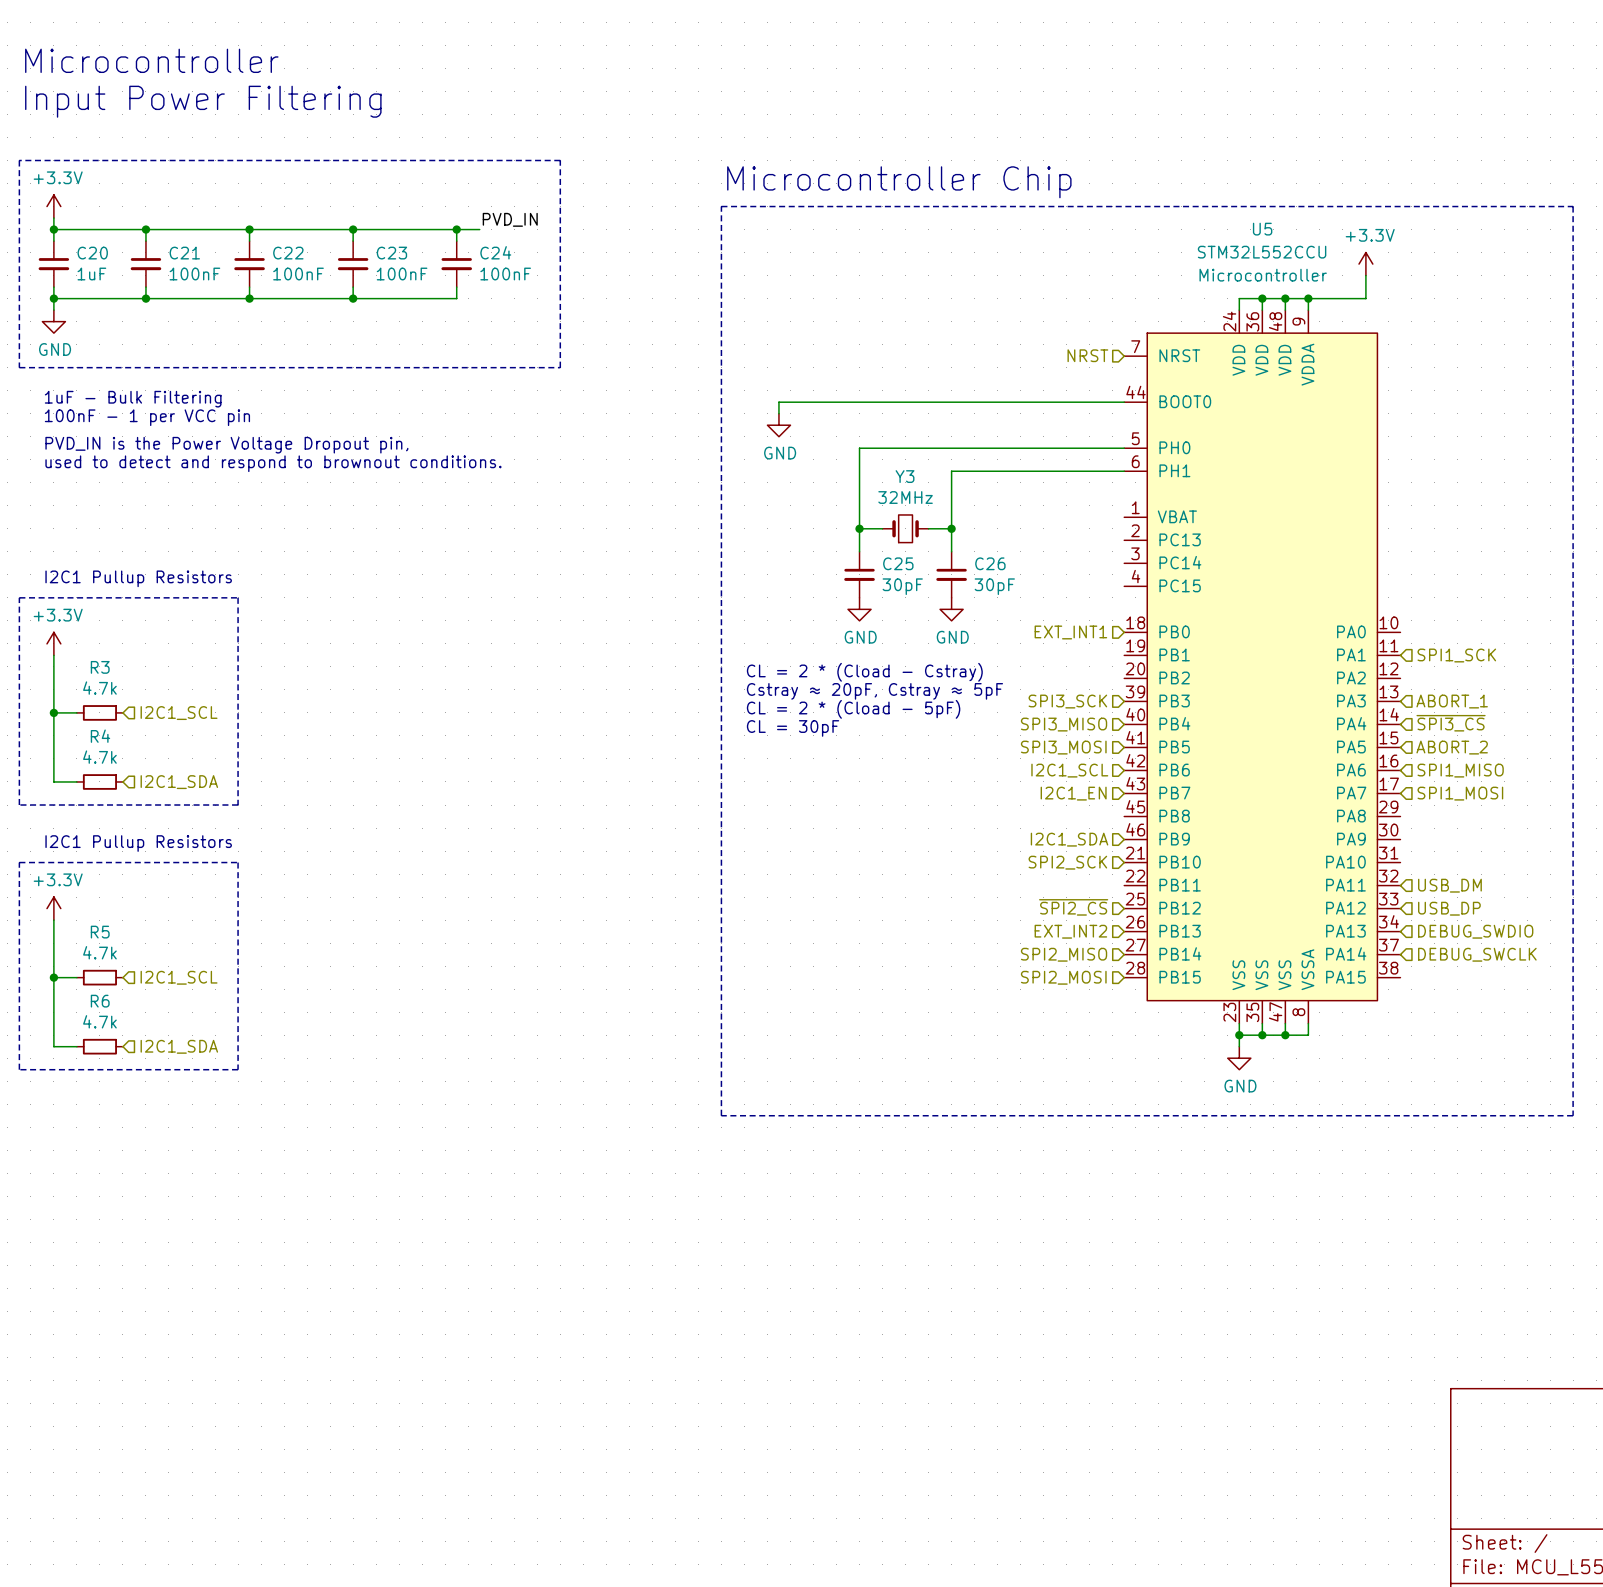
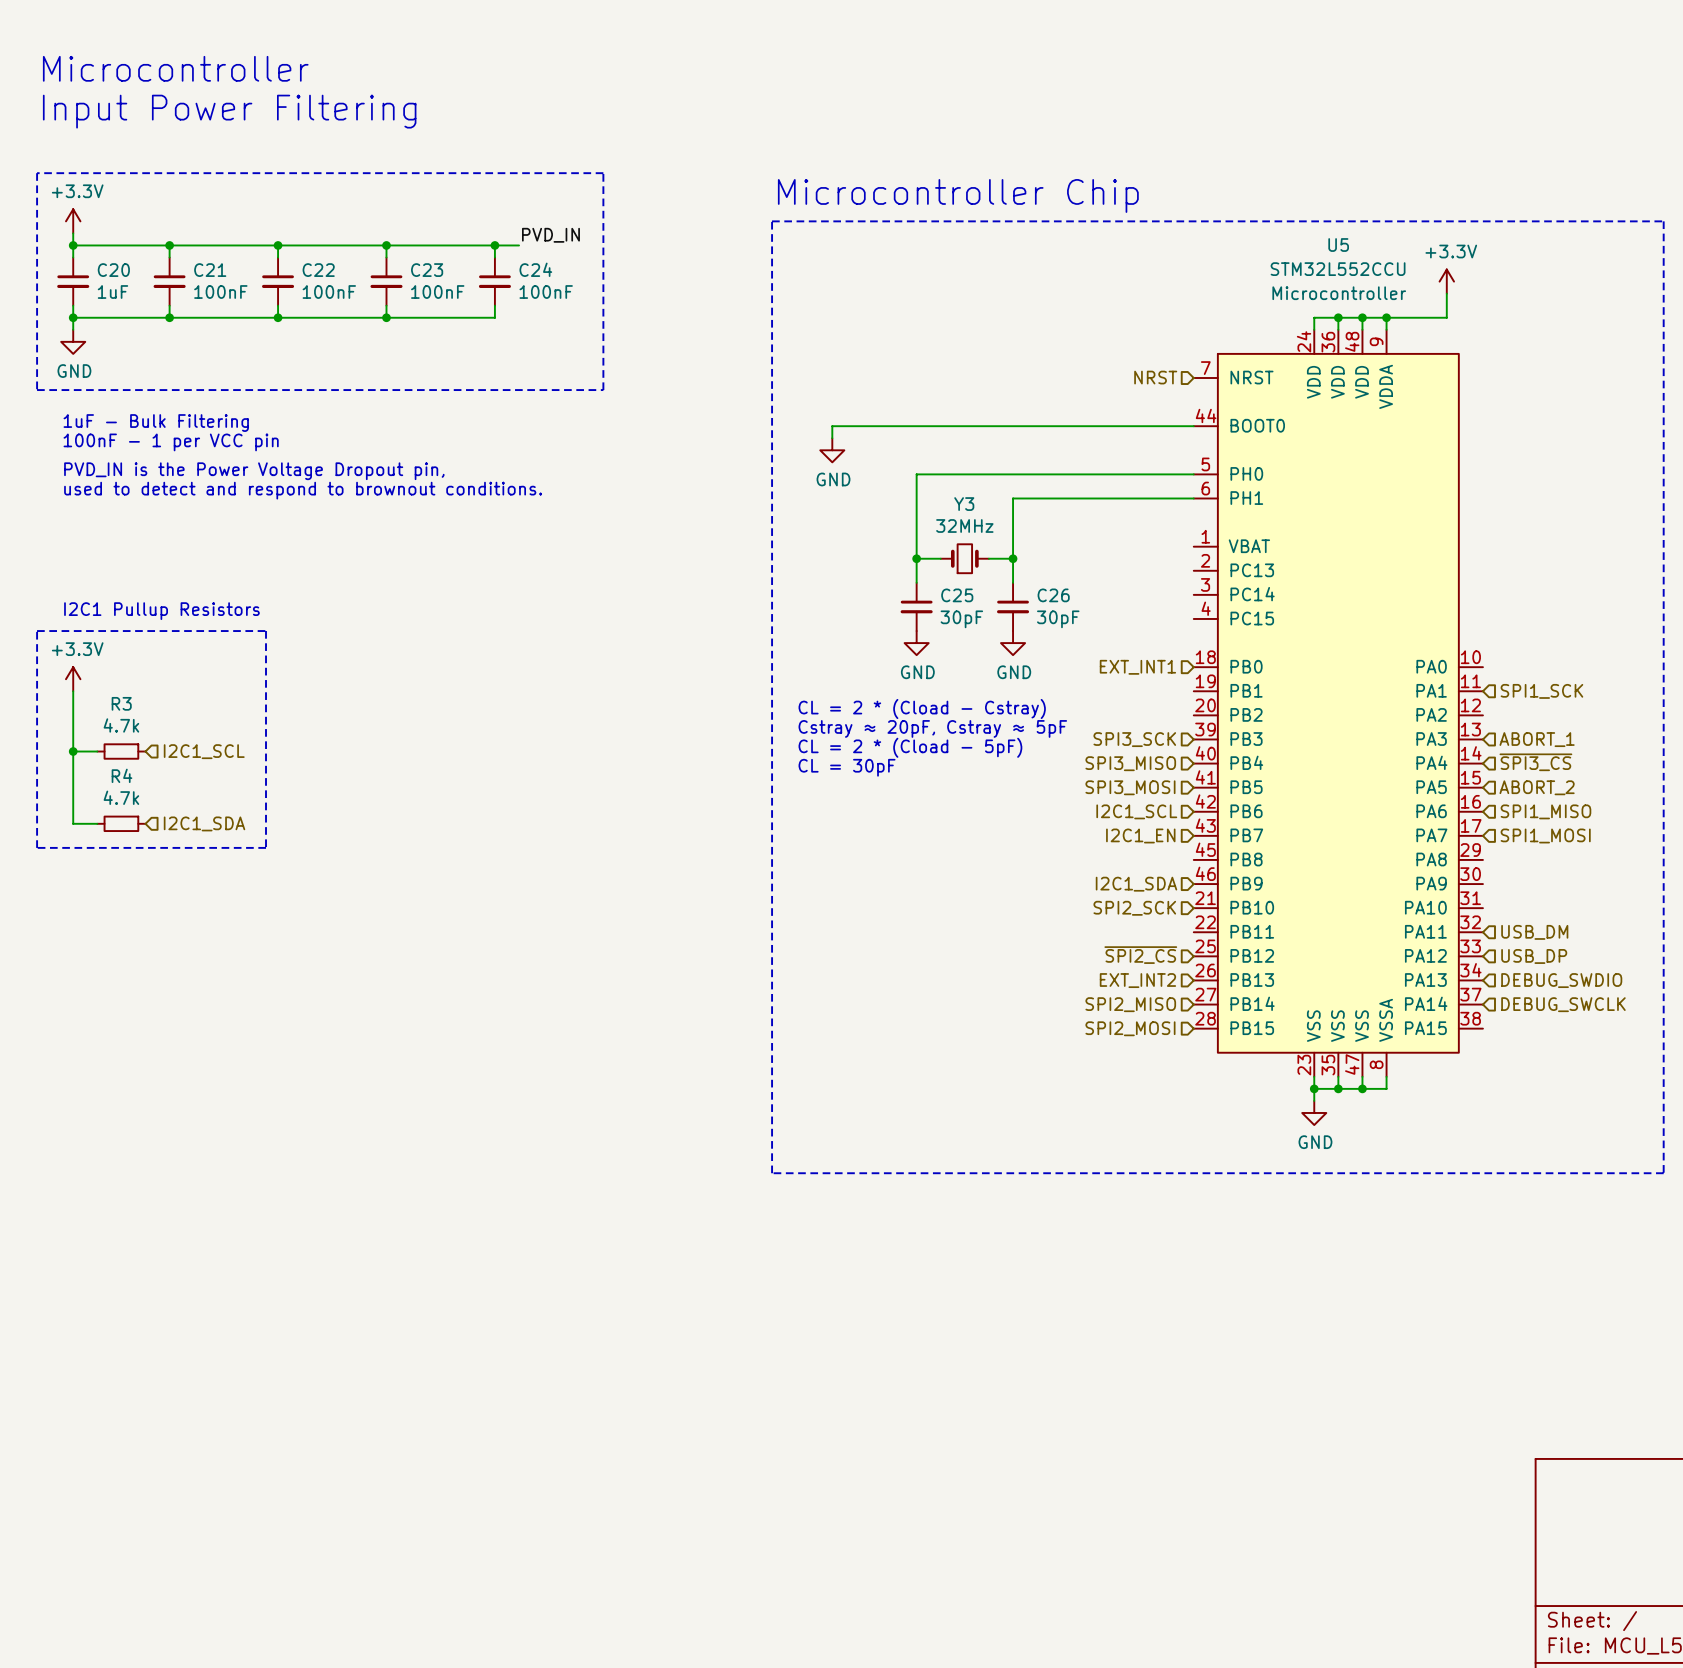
text: I2C1 Pullup Resistors (138, 843) -> none
line: (19, 862) (19, 1069) (238, 1069) (238, 862) (19, 862) -> none
power symbol: +3.3V (53, 908) -> none
wire: (53, 920) (53, 1046) (76, 1046) -> none
wire: (53, 977) (76, 977) -> none
junction: (53, 977) -> none
R5: 4.7k (99, 977) -> none
hierarchical label: I2C1_SCL (179, 977) -> none
R6: 4.7k (99, 1046) -> none
hierarchical label: I2C1_SDA (179, 1046) -> none

